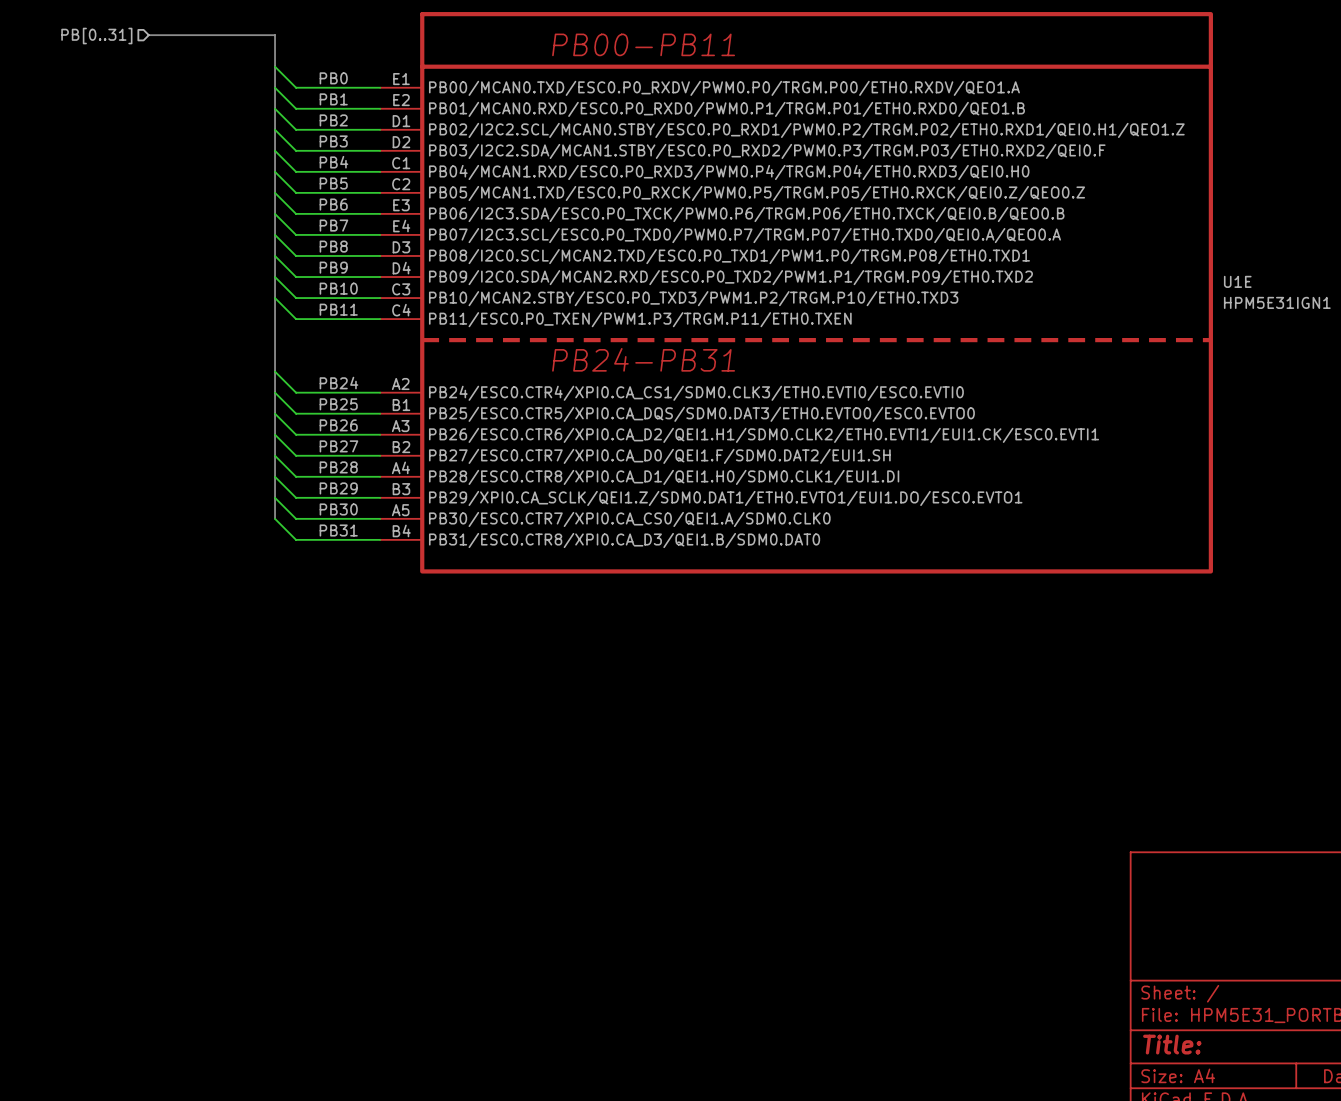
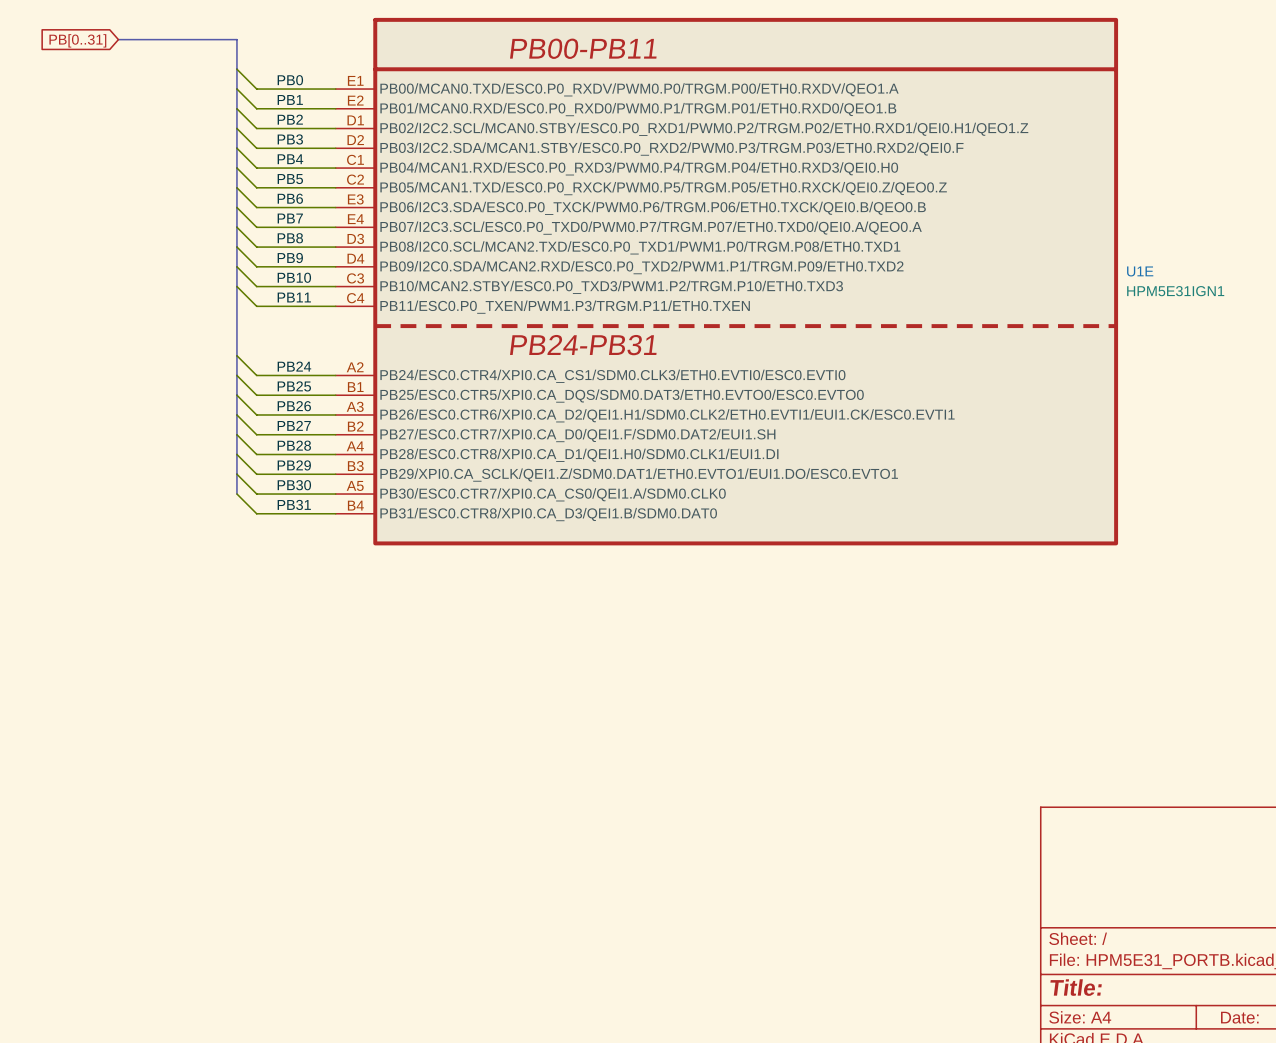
hierarchical label: PB[0..31] (96, 36) -> none
global label: none -> PB[0..31] (77, 40)

